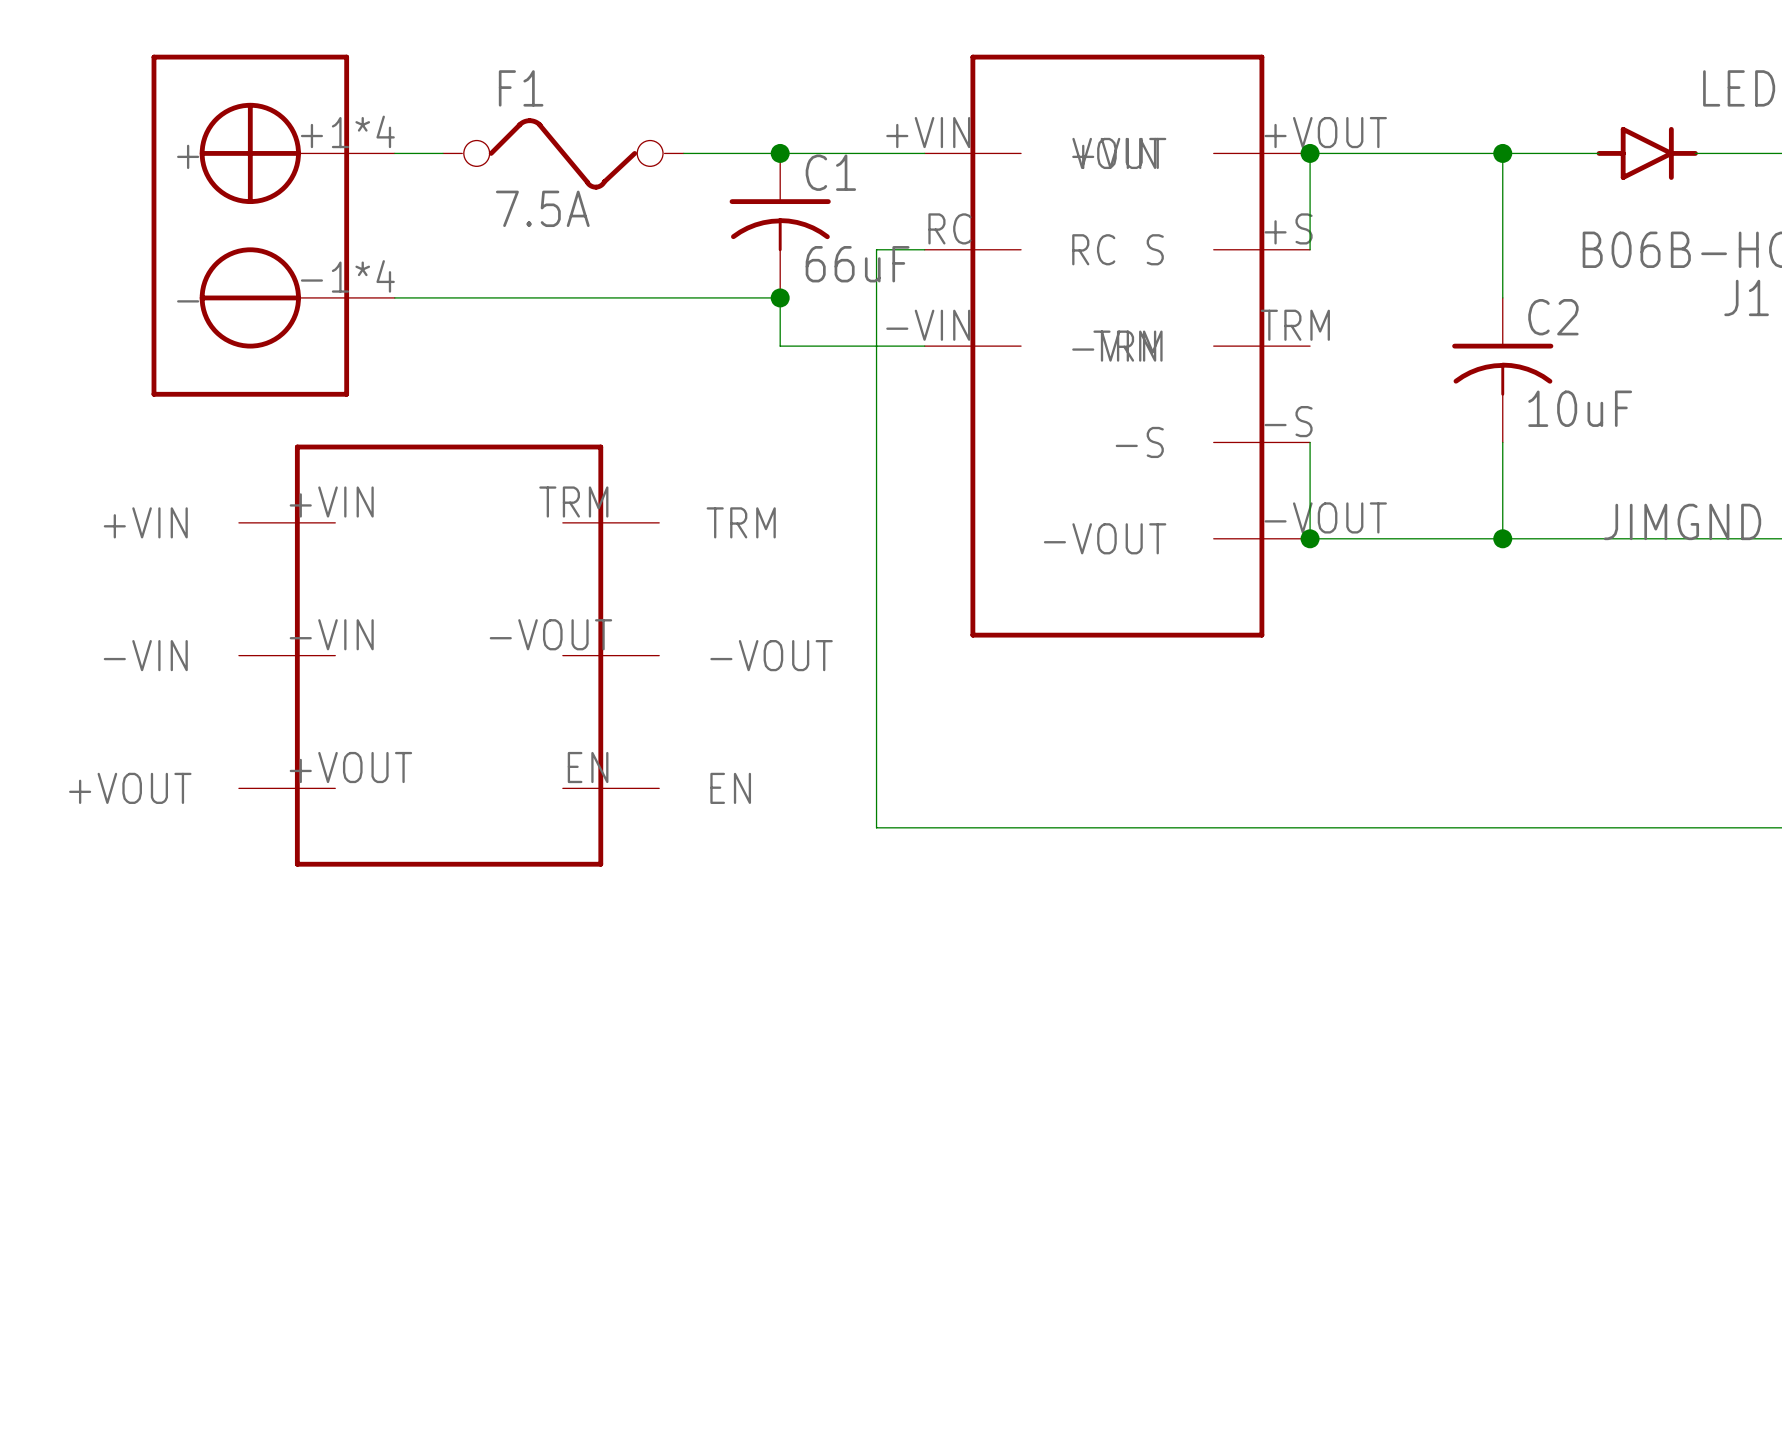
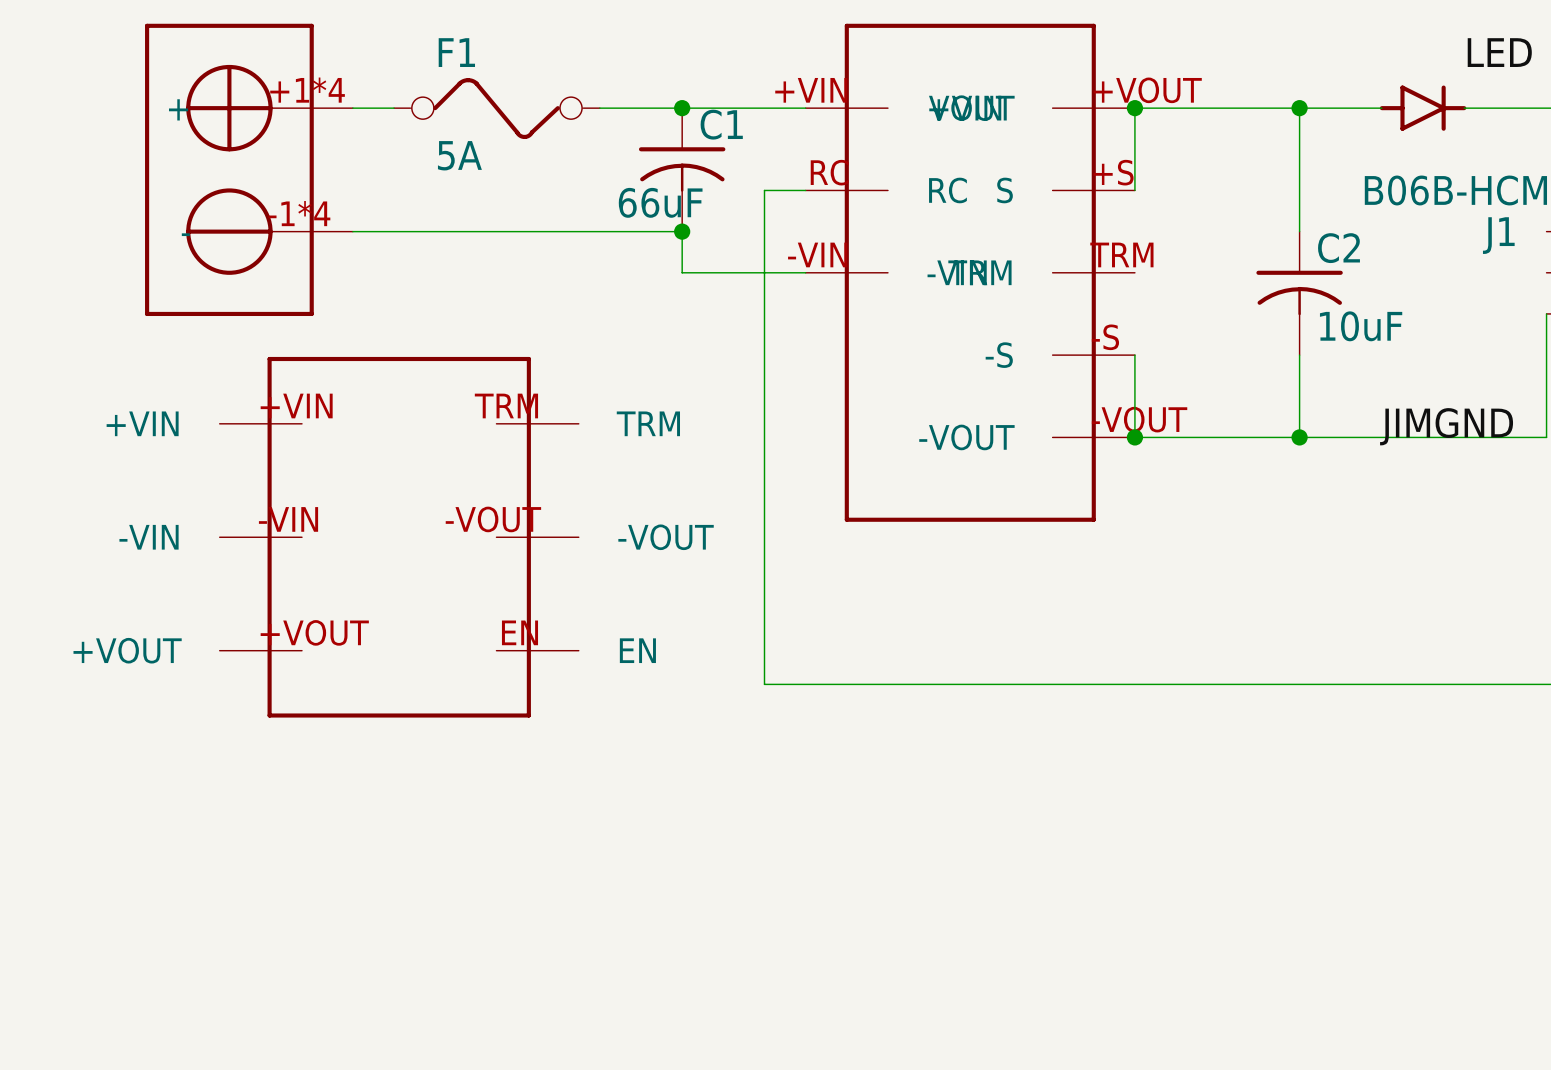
F1 value: 7.5A (542, 208) -> 5A (459, 155)
C1 value position: 66uF (857, 264) -> 66uF (660, 202)

